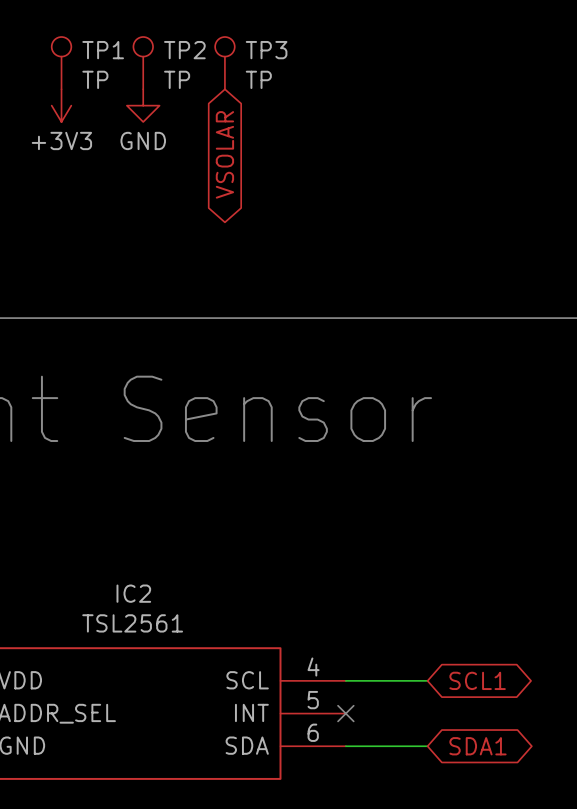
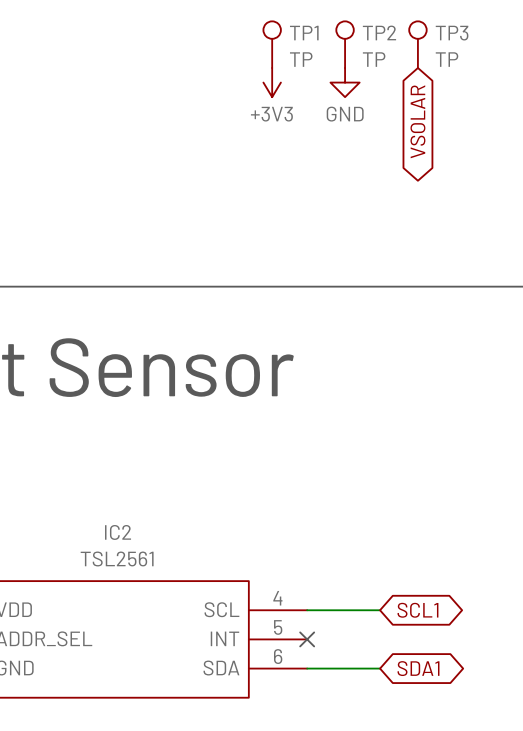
TP1 position: (61, 63) -> (272, 44)
TP2 position: (143, 63) -> (345, 44)
TP3 position: (224, 63) -> (417, 44)
power symbol position: +3V3 (61, 105) -> +3V3 (272, 82)
power symbol position: GND (143, 105) -> GND (345, 82)
global label position: VSOLAR (224, 154) -> VSOLAR (417, 121)

